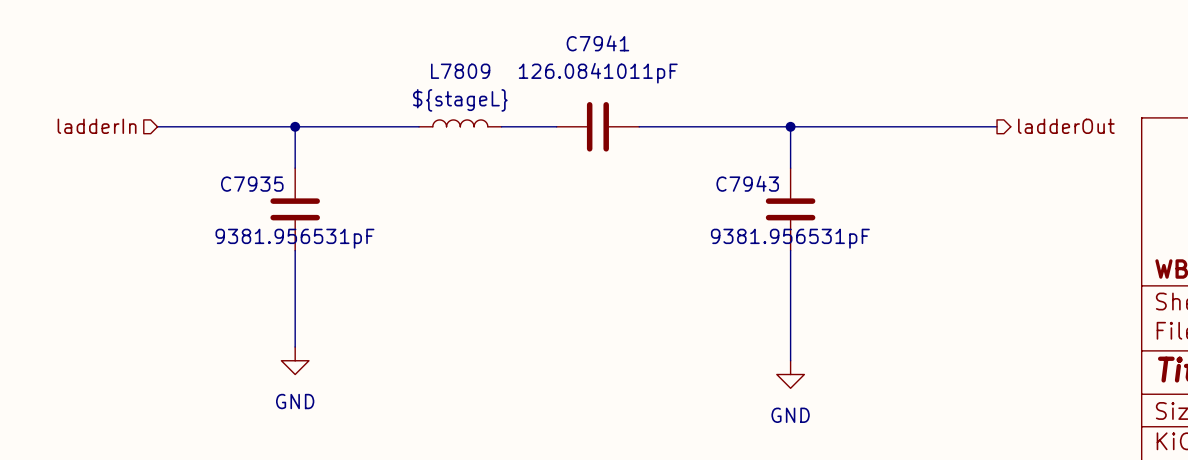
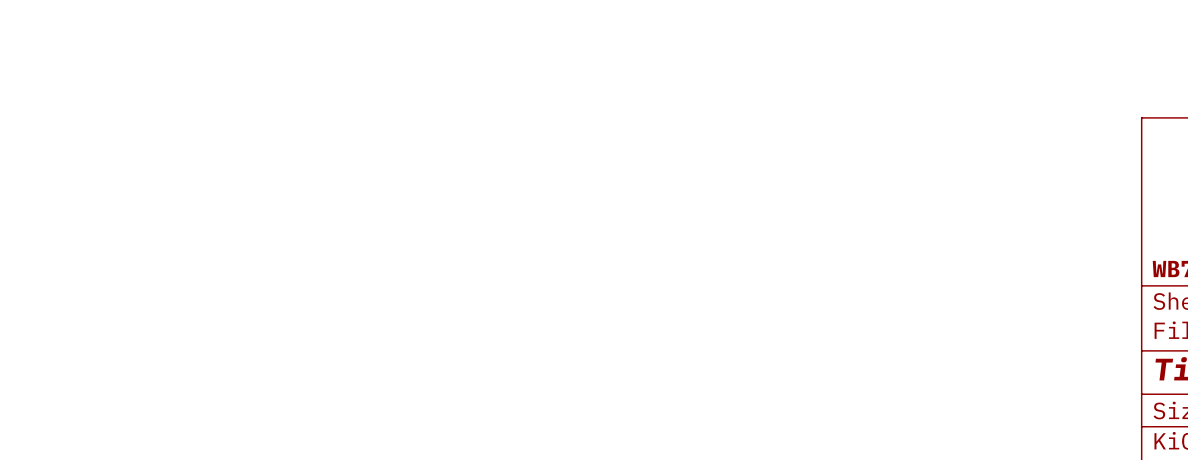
L7809: ${stageL} (460, 123) -> none
hierarchical label: ladderIn (97, 126) -> none
wire: (157, 126) (419, 126) -> none
wire: (295, 126) (295, 168) -> none
junction: (295, 126) -> none
wire: (501, 126) (556, 126) -> none
C7941: 126.0841011pF (597, 126) -> none
wire: (639, 126) (997, 126) -> none
wire: (790, 126) (790, 168) -> none
junction: (790, 126) -> none
hierarchical label: ladderOut (1066, 126) -> none
C7935: 9381.956531pF (295, 209) -> none
C7943: 9381.956531pF (790, 209) -> none
wire: (295, 250) (295, 346) -> none
wire: (790, 250) (790, 360) -> none
power symbol: GND (295, 360) -> none
power symbol: GND (790, 374) -> none

